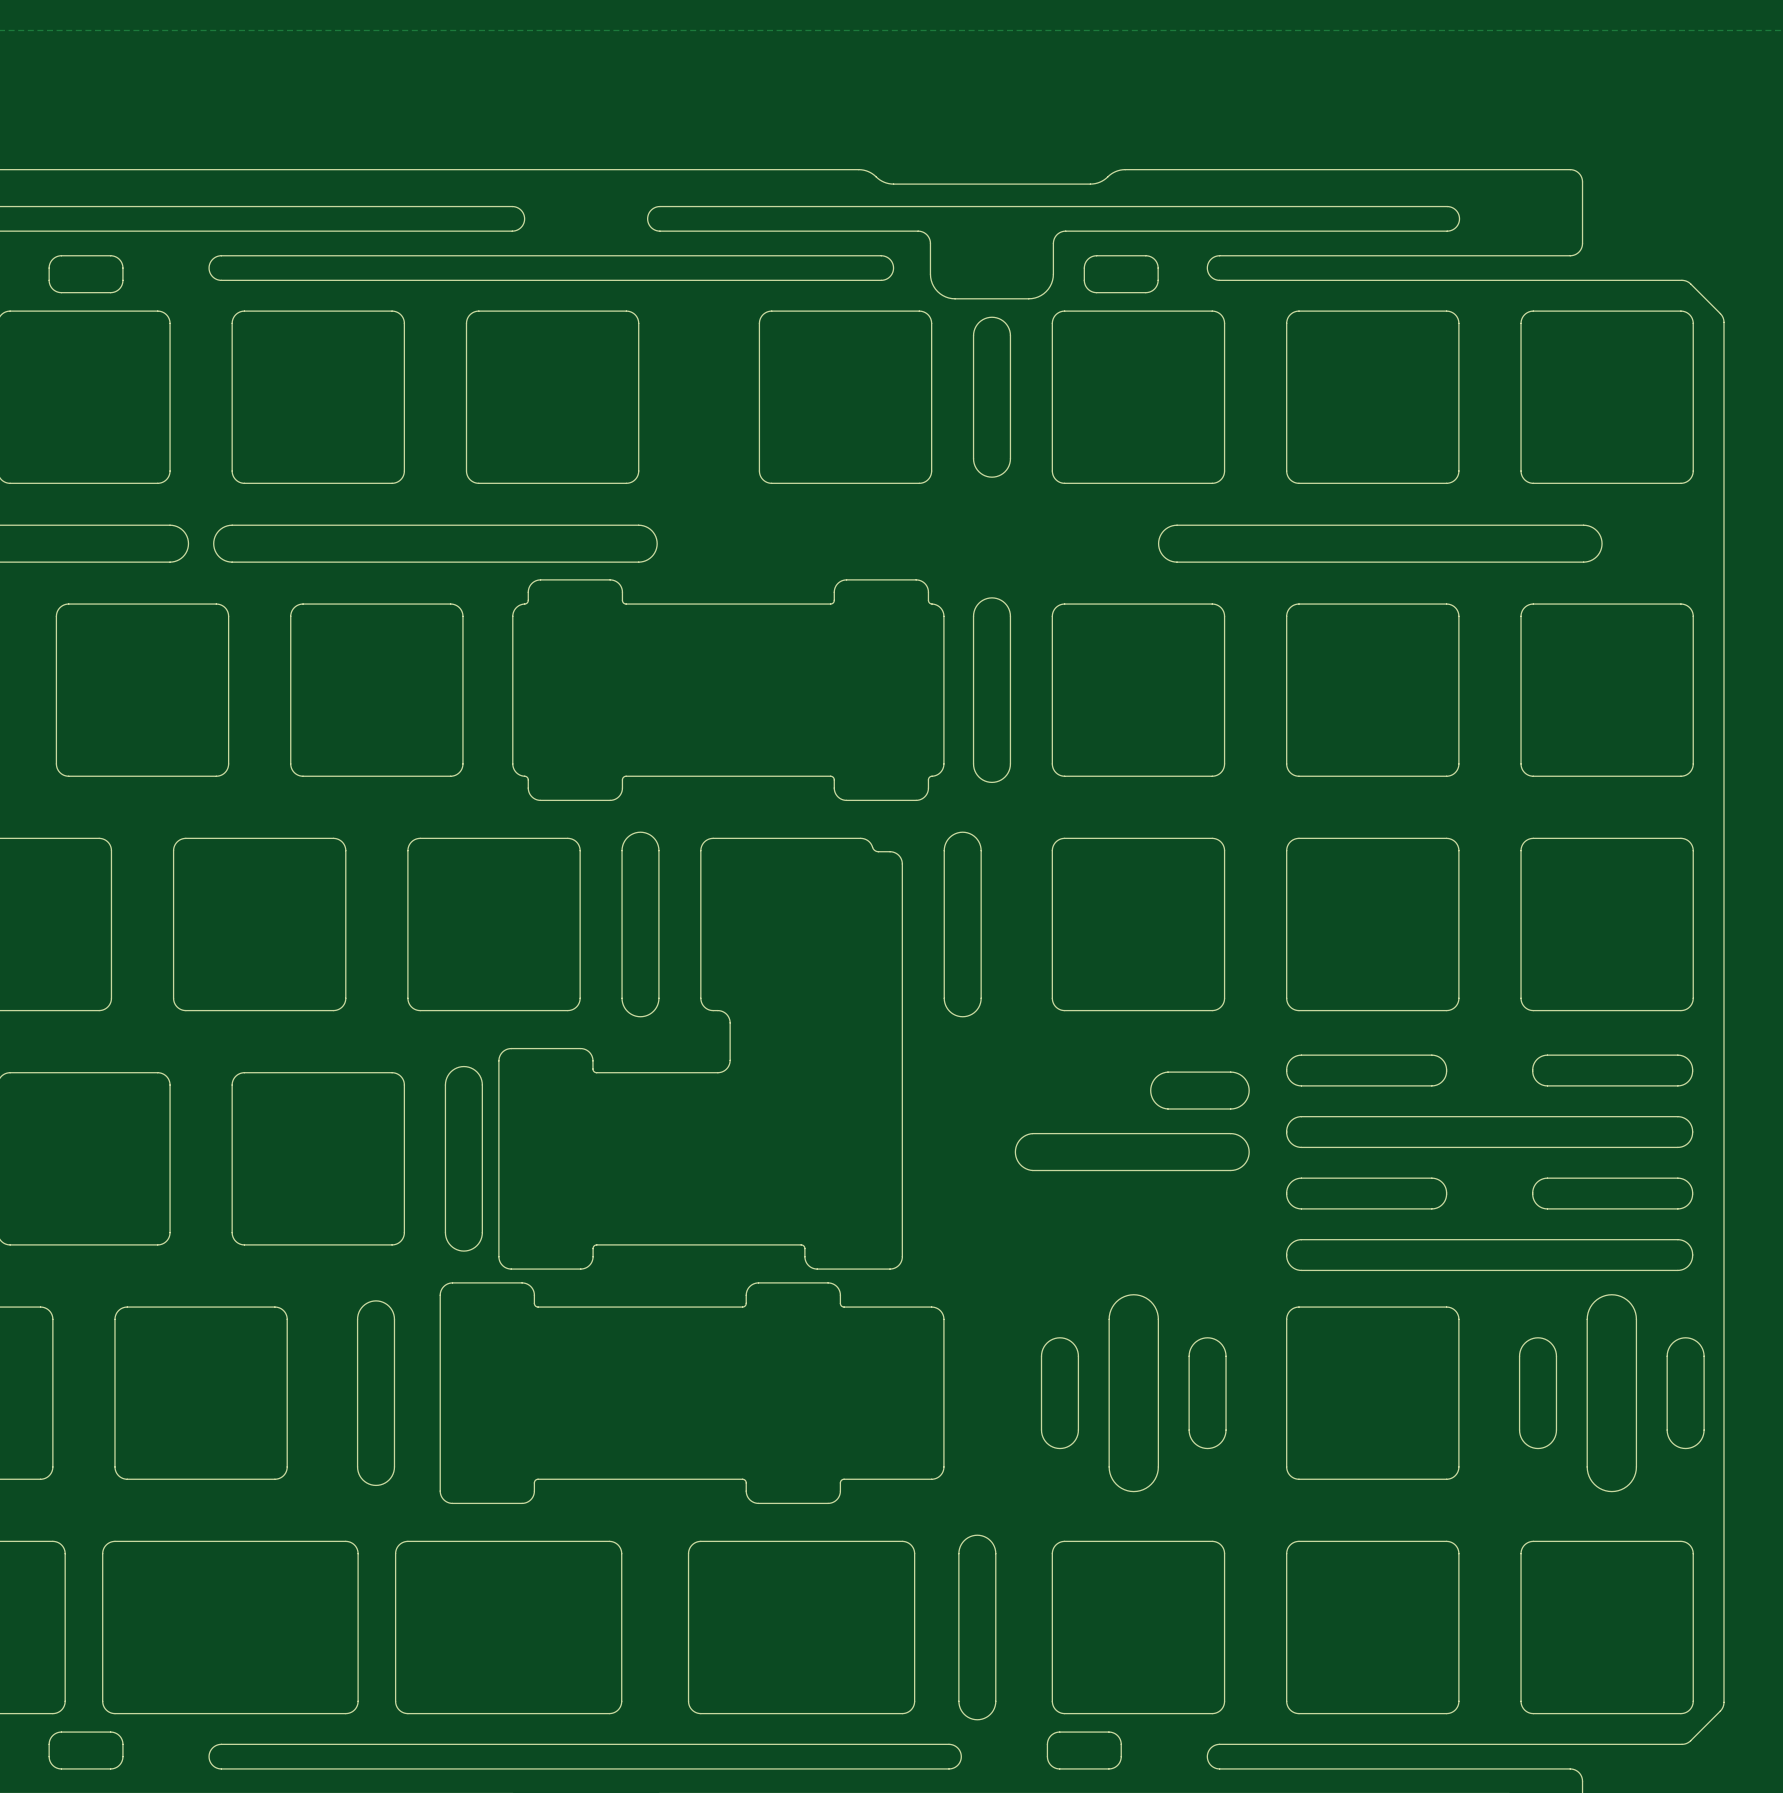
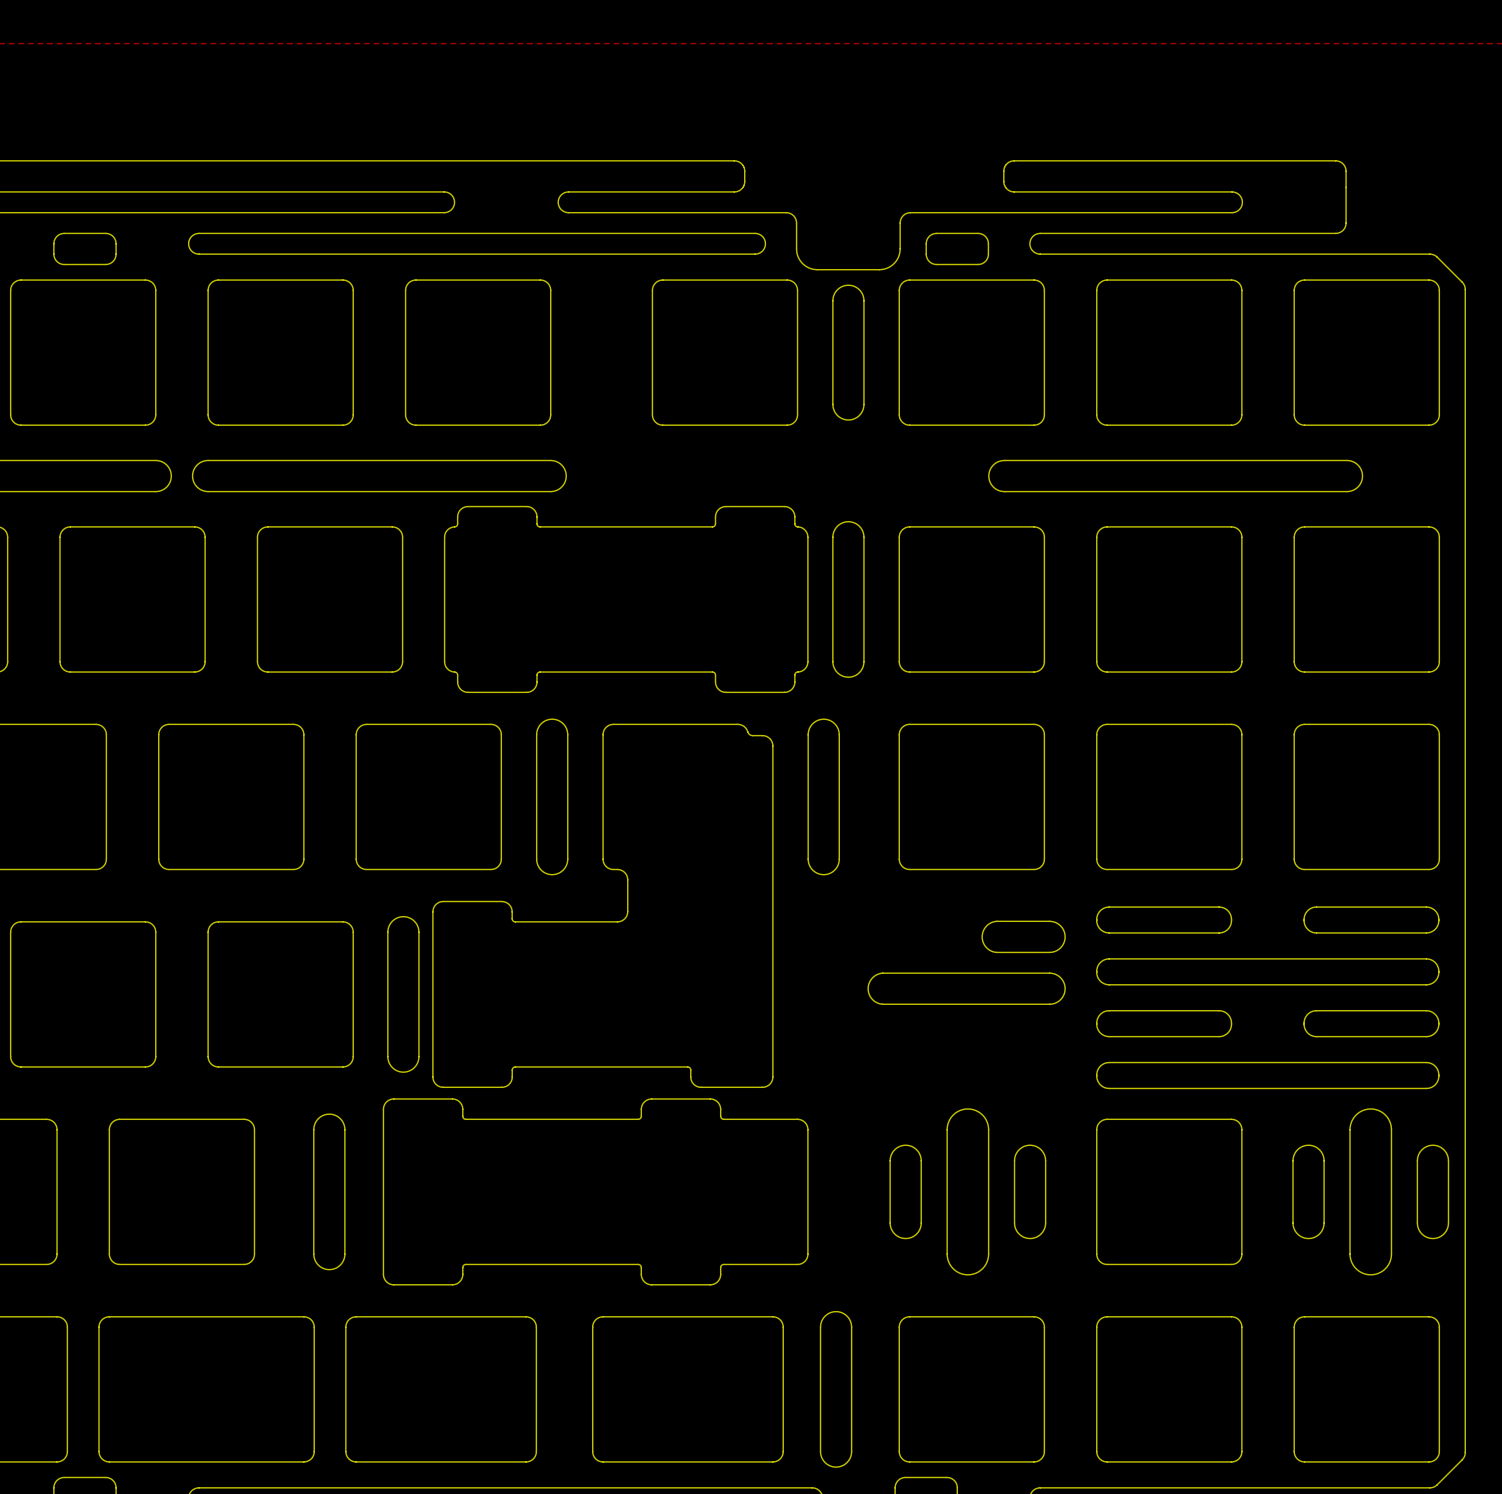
board edge: (856, 169) (868, 171) (881, 181) (893, 184) (1090, 184) (1099, 182) (1113, 172) (1122, 169) (1188, 169) -> (1014, 191) (1006, 188) (1003, 181) (1004, 166) (1008, 162) (1014, 160)
board edge: (856, 206) (1188, 206) -> (734, 191) (740, 190) (743, 186) (744, 171) (742, 164) (734, 160)

